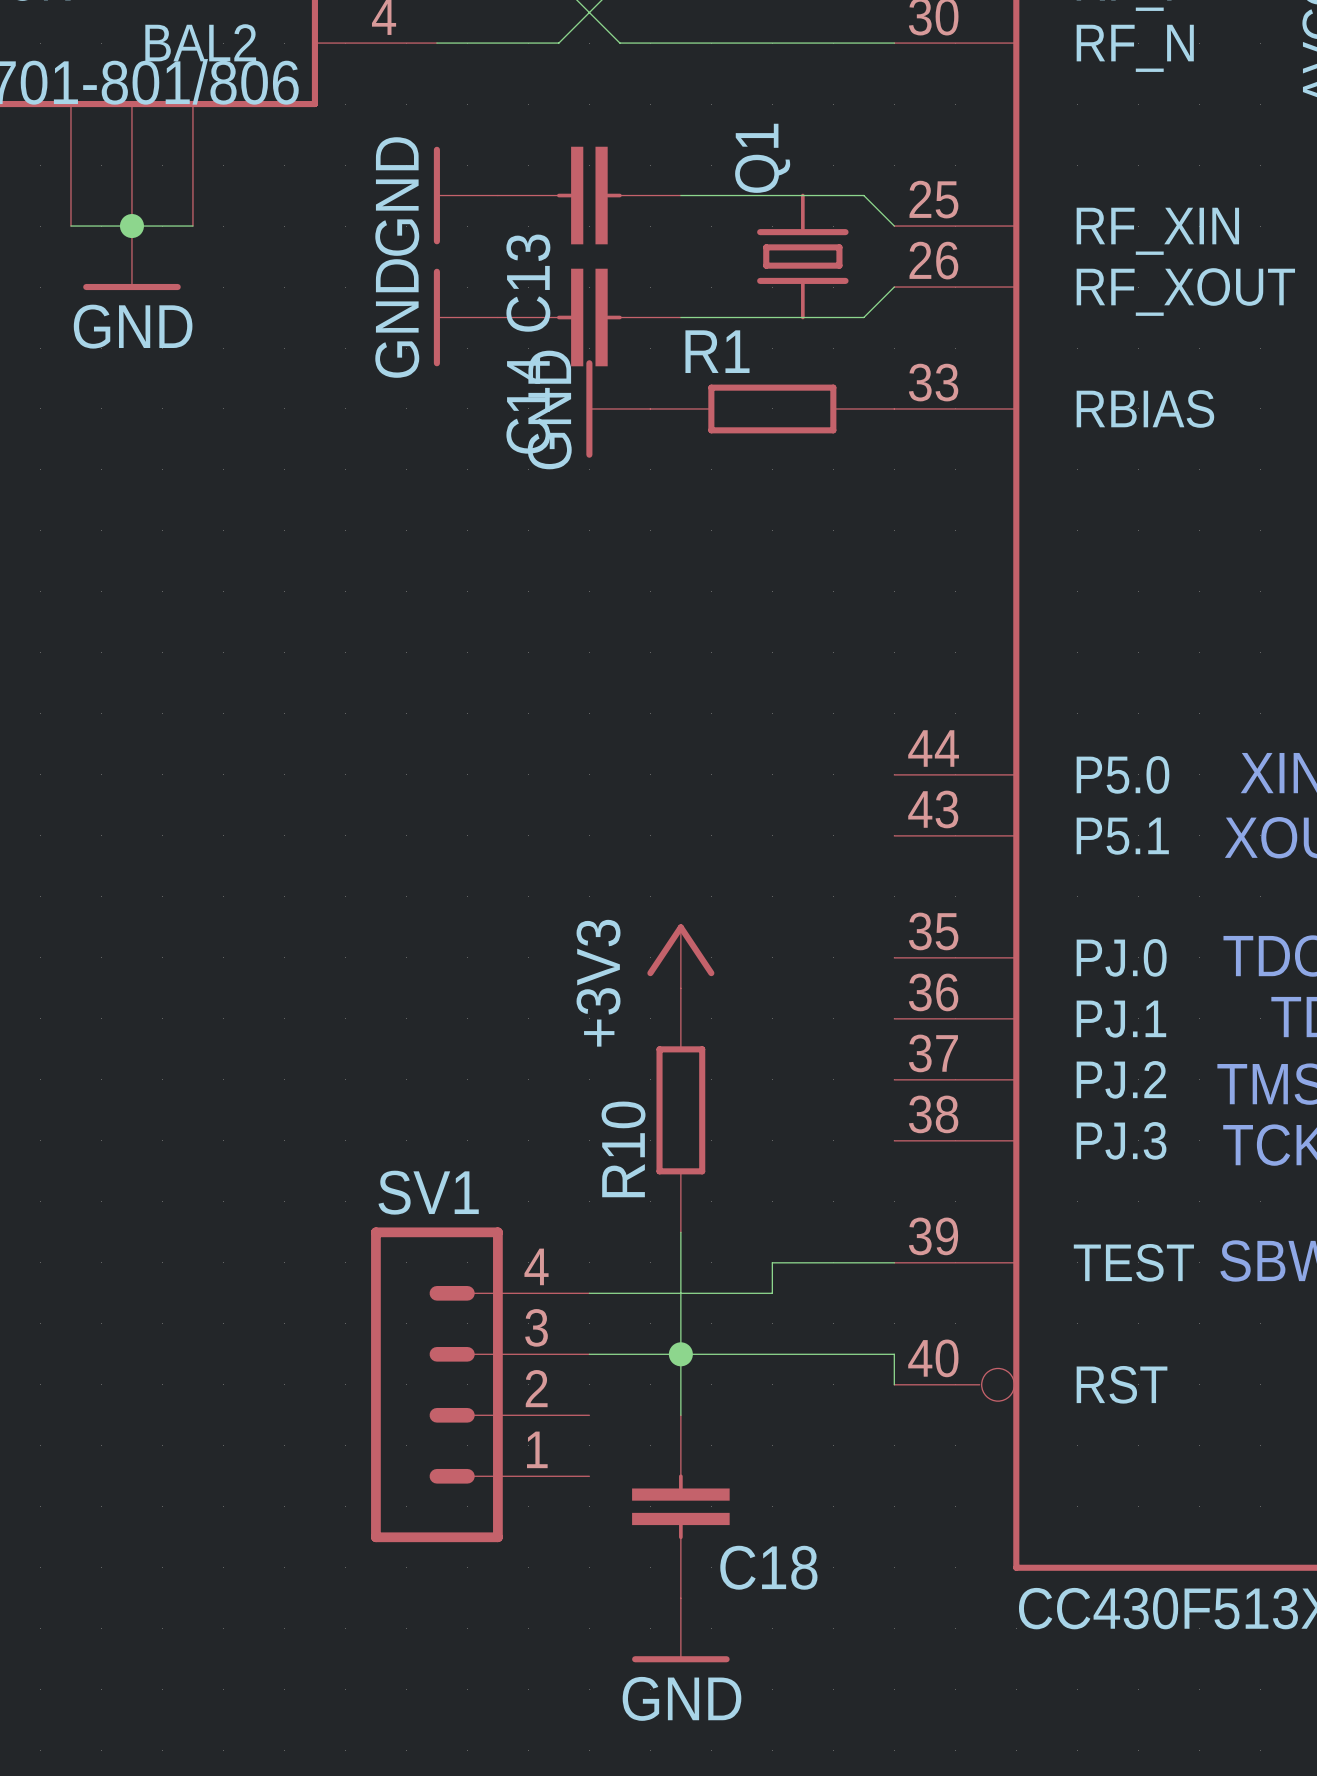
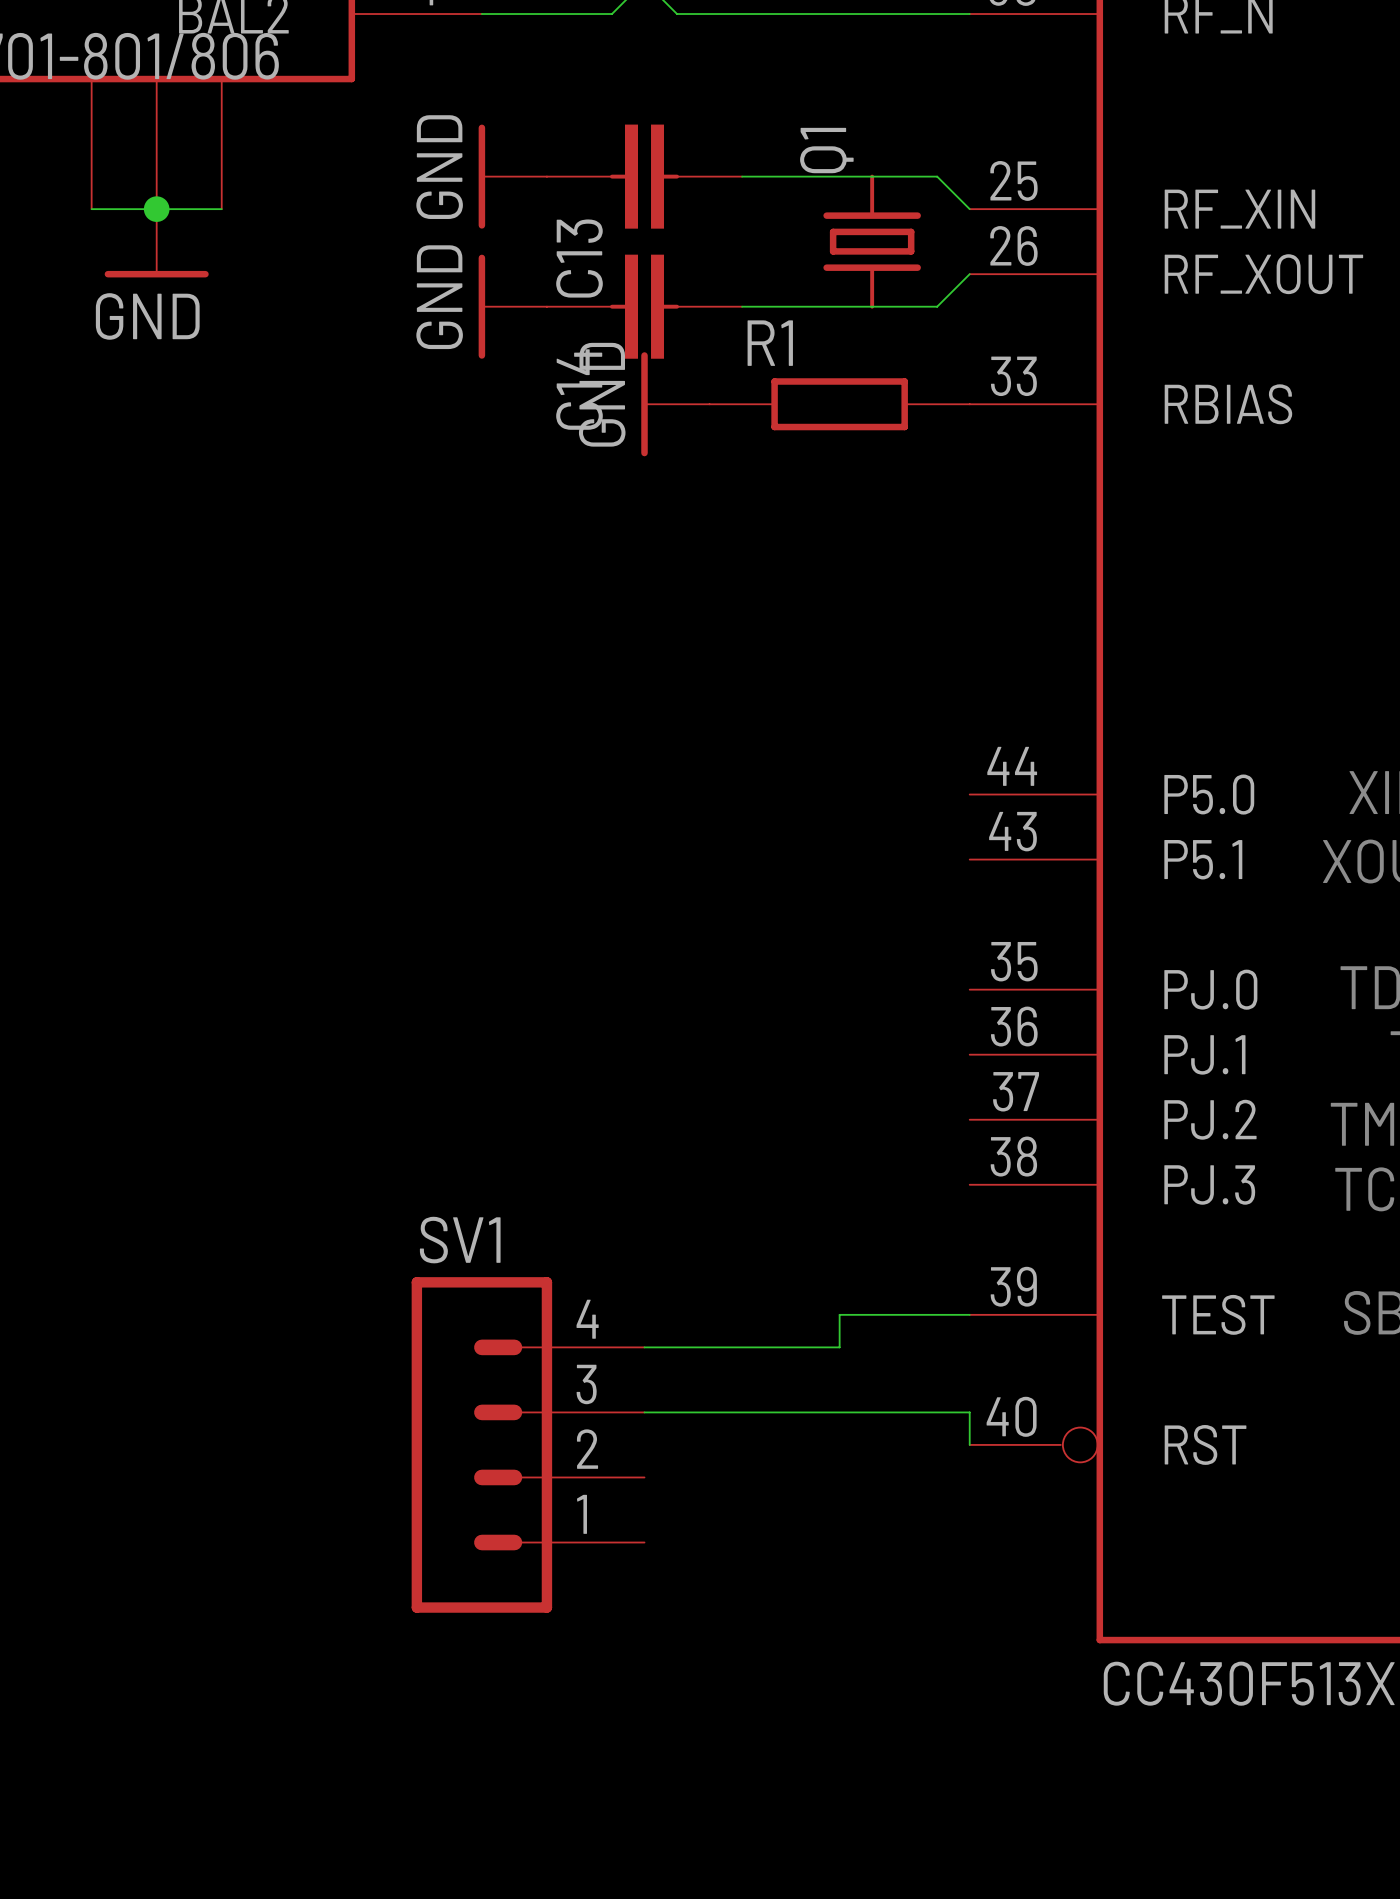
power symbol: +3V3 (680, 956) -> none
R10: (680, 1110) -> none
wire: (680, 1232) (680, 1415) -> none
junction: (680, 1354) -> none
C18: (680, 1506) -> none
power symbol: GND (680, 1630) -> none

